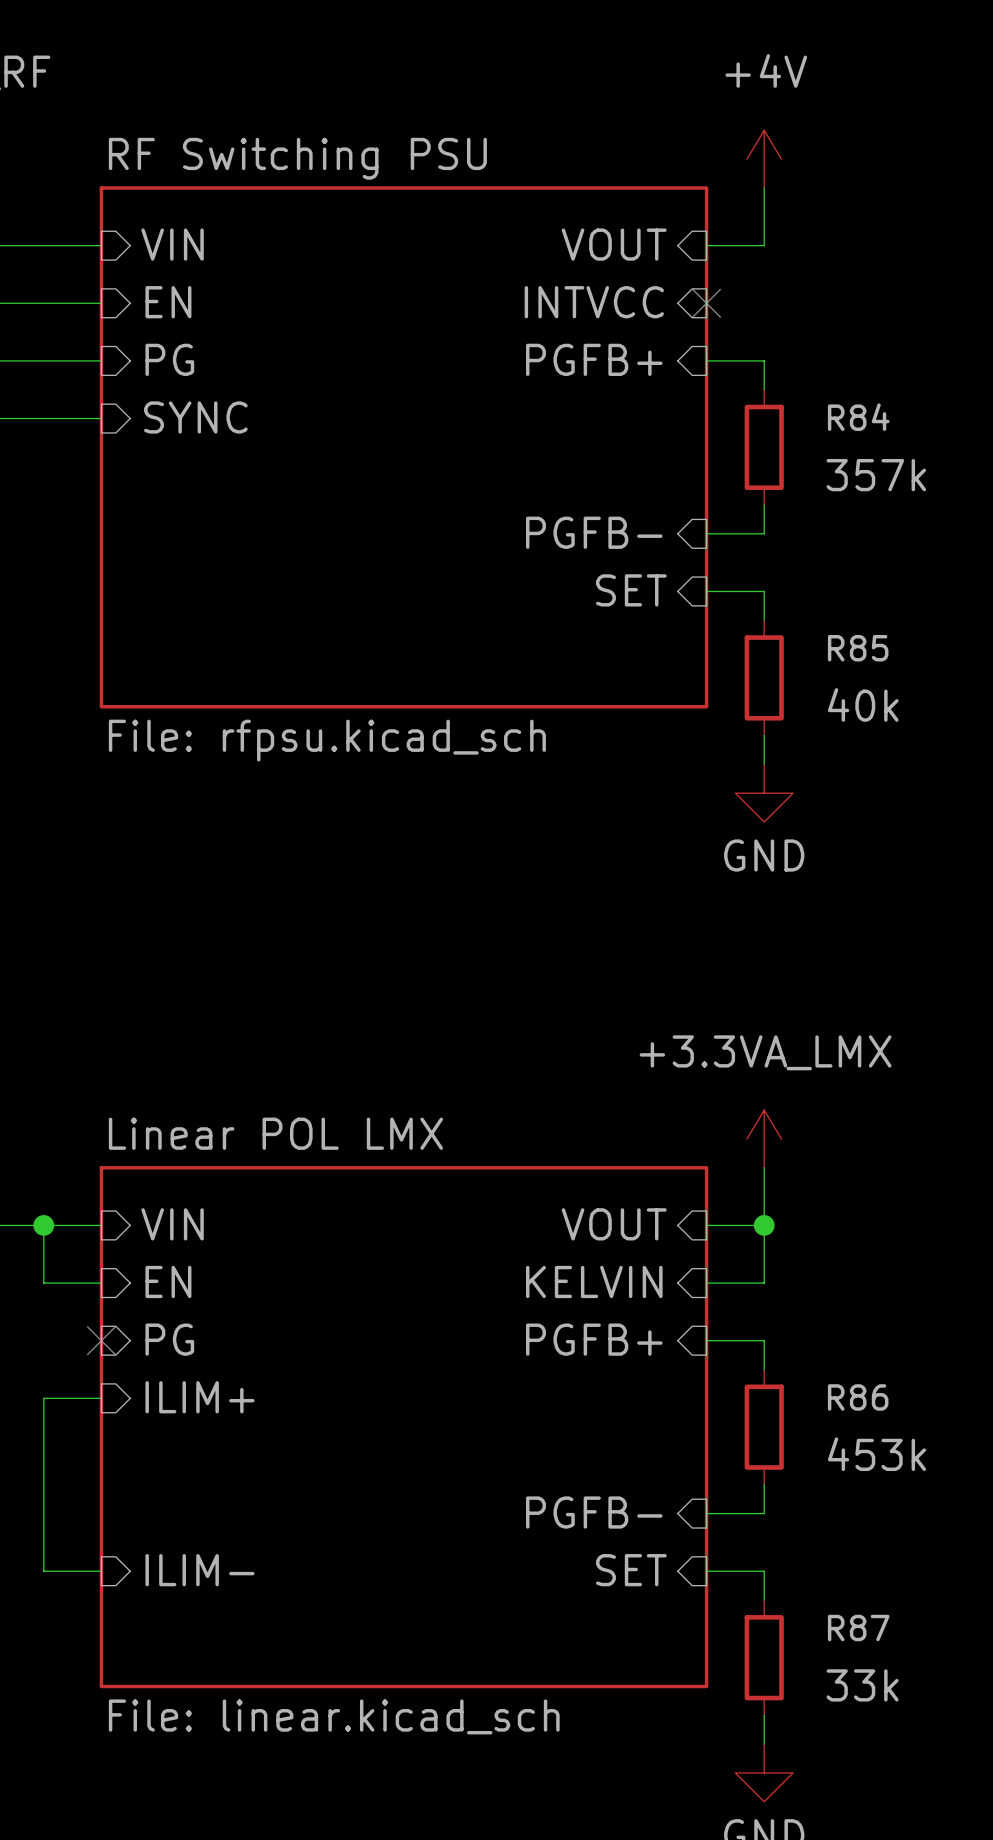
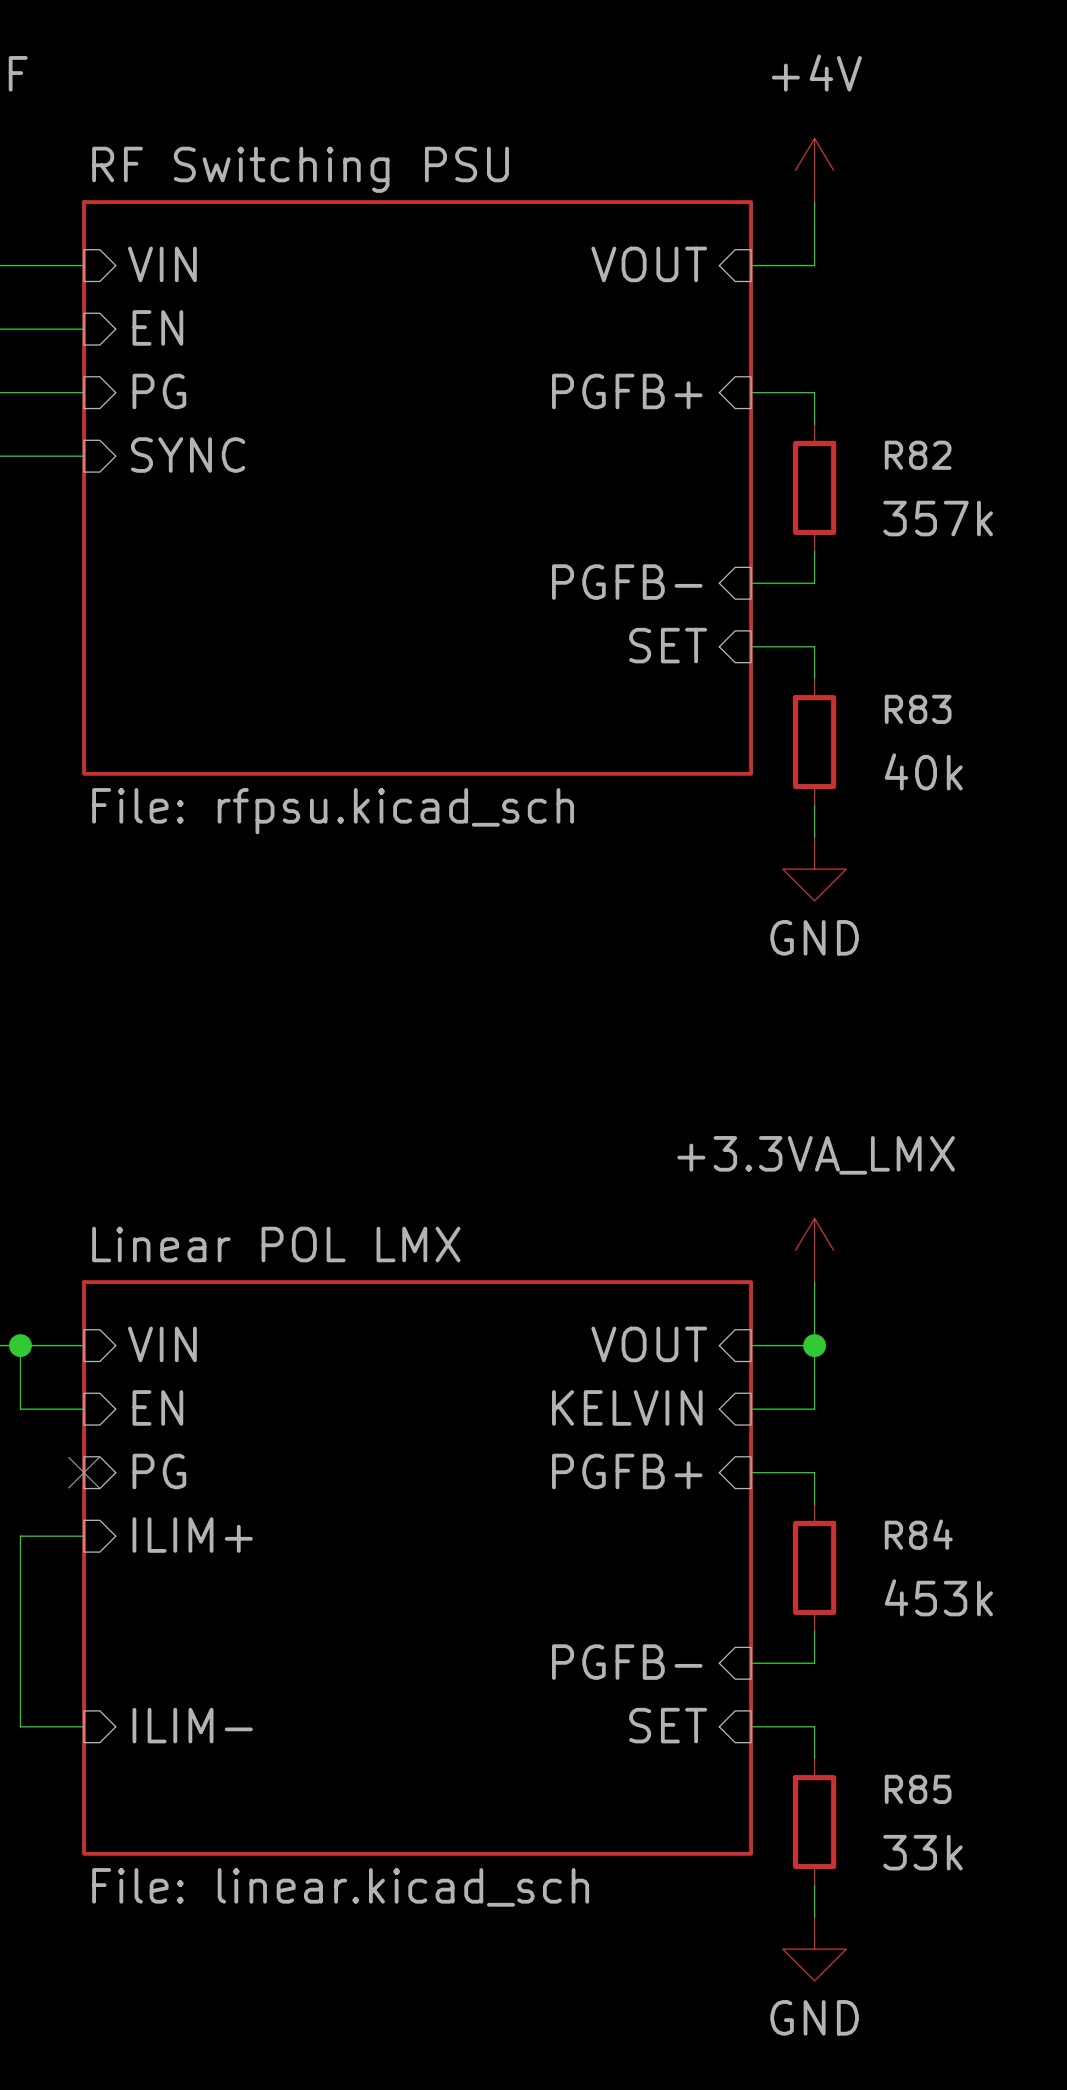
sheet pin: INTVCC (594, 302) -> none
no-connect mark: (706, 303) -> none
R84 name: R84 (858, 417) -> R82 (918, 455)
R85 name: R85 (858, 648) -> R83 (918, 709)
R86 name: R86 (858, 1397) -> R84 (918, 1534)
R87 name: R87 (858, 1628) -> R85 (918, 1789)

